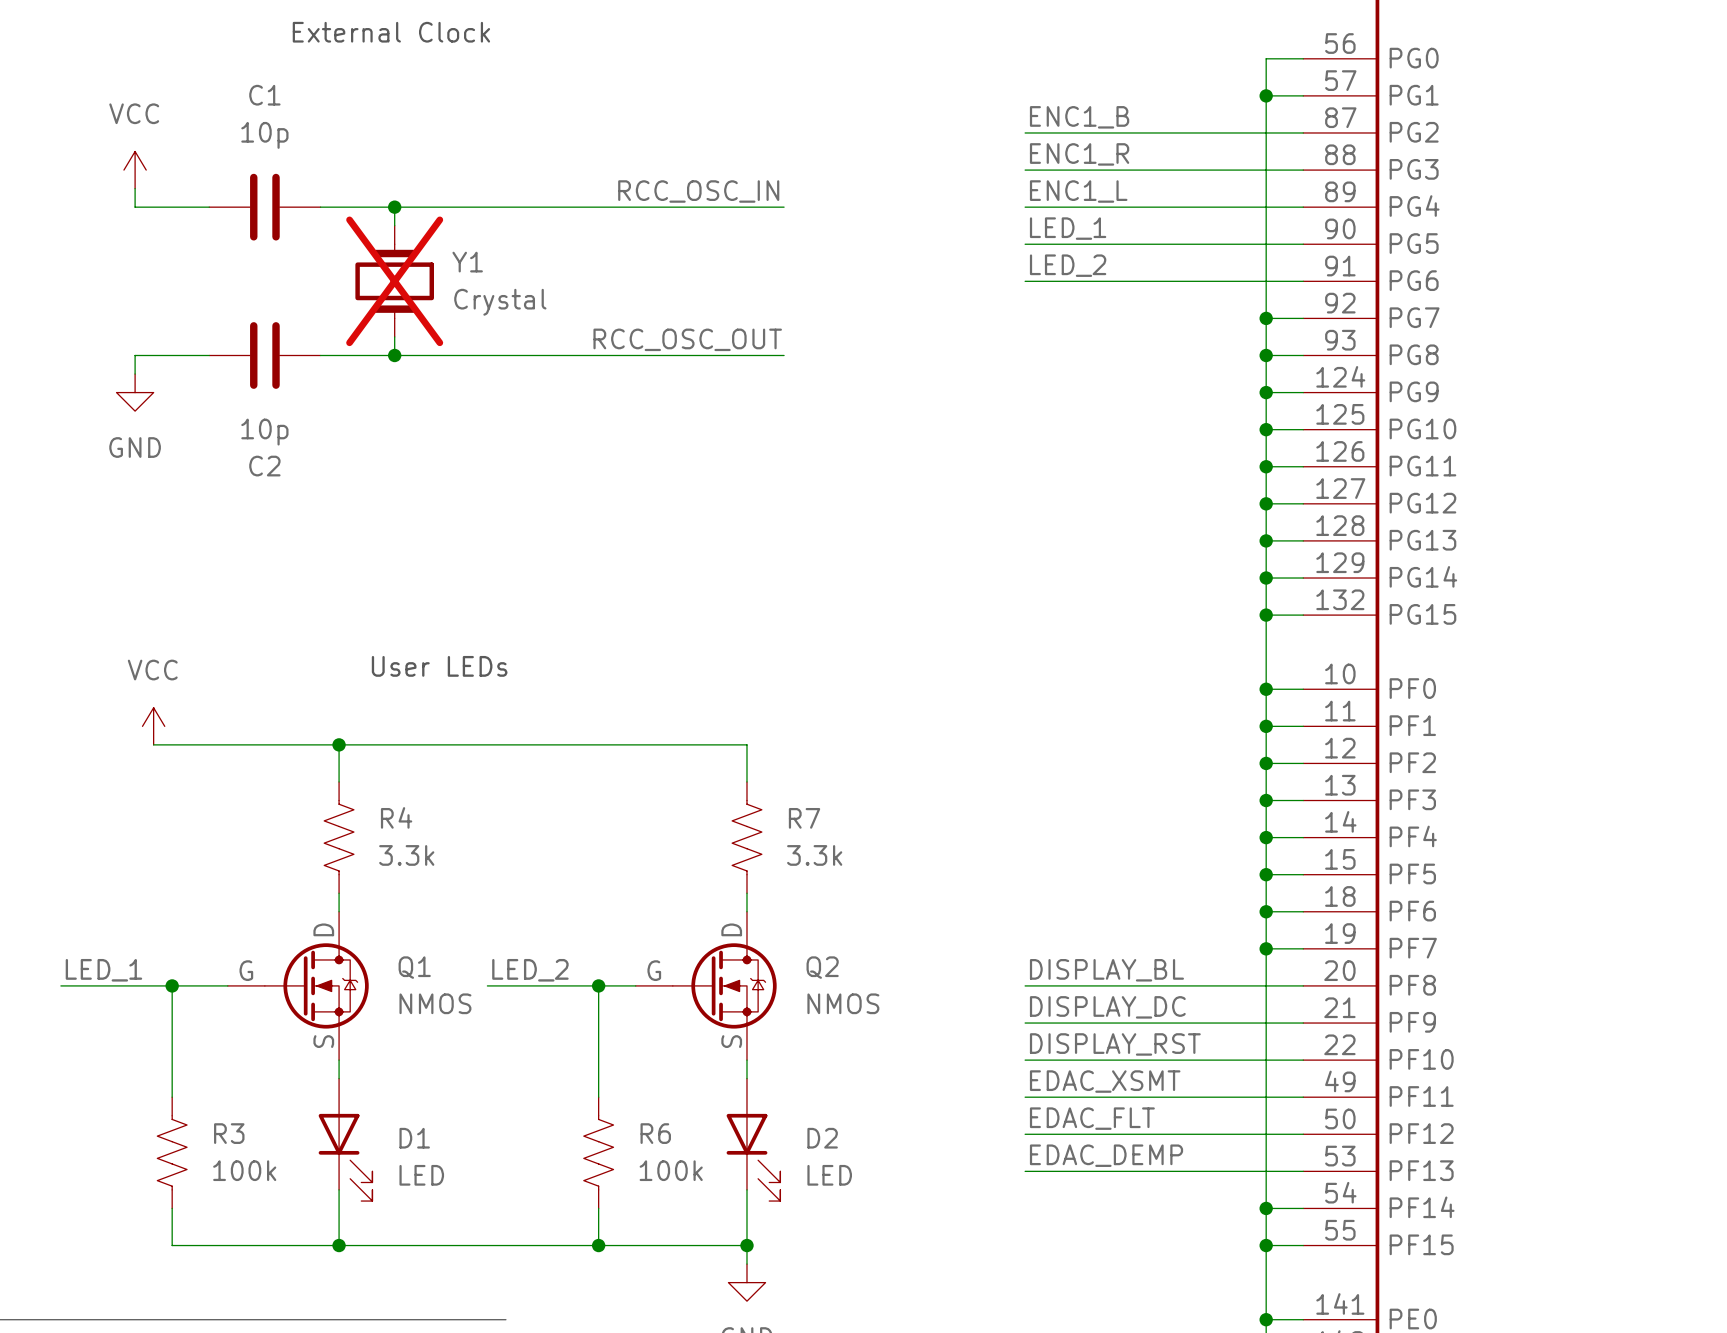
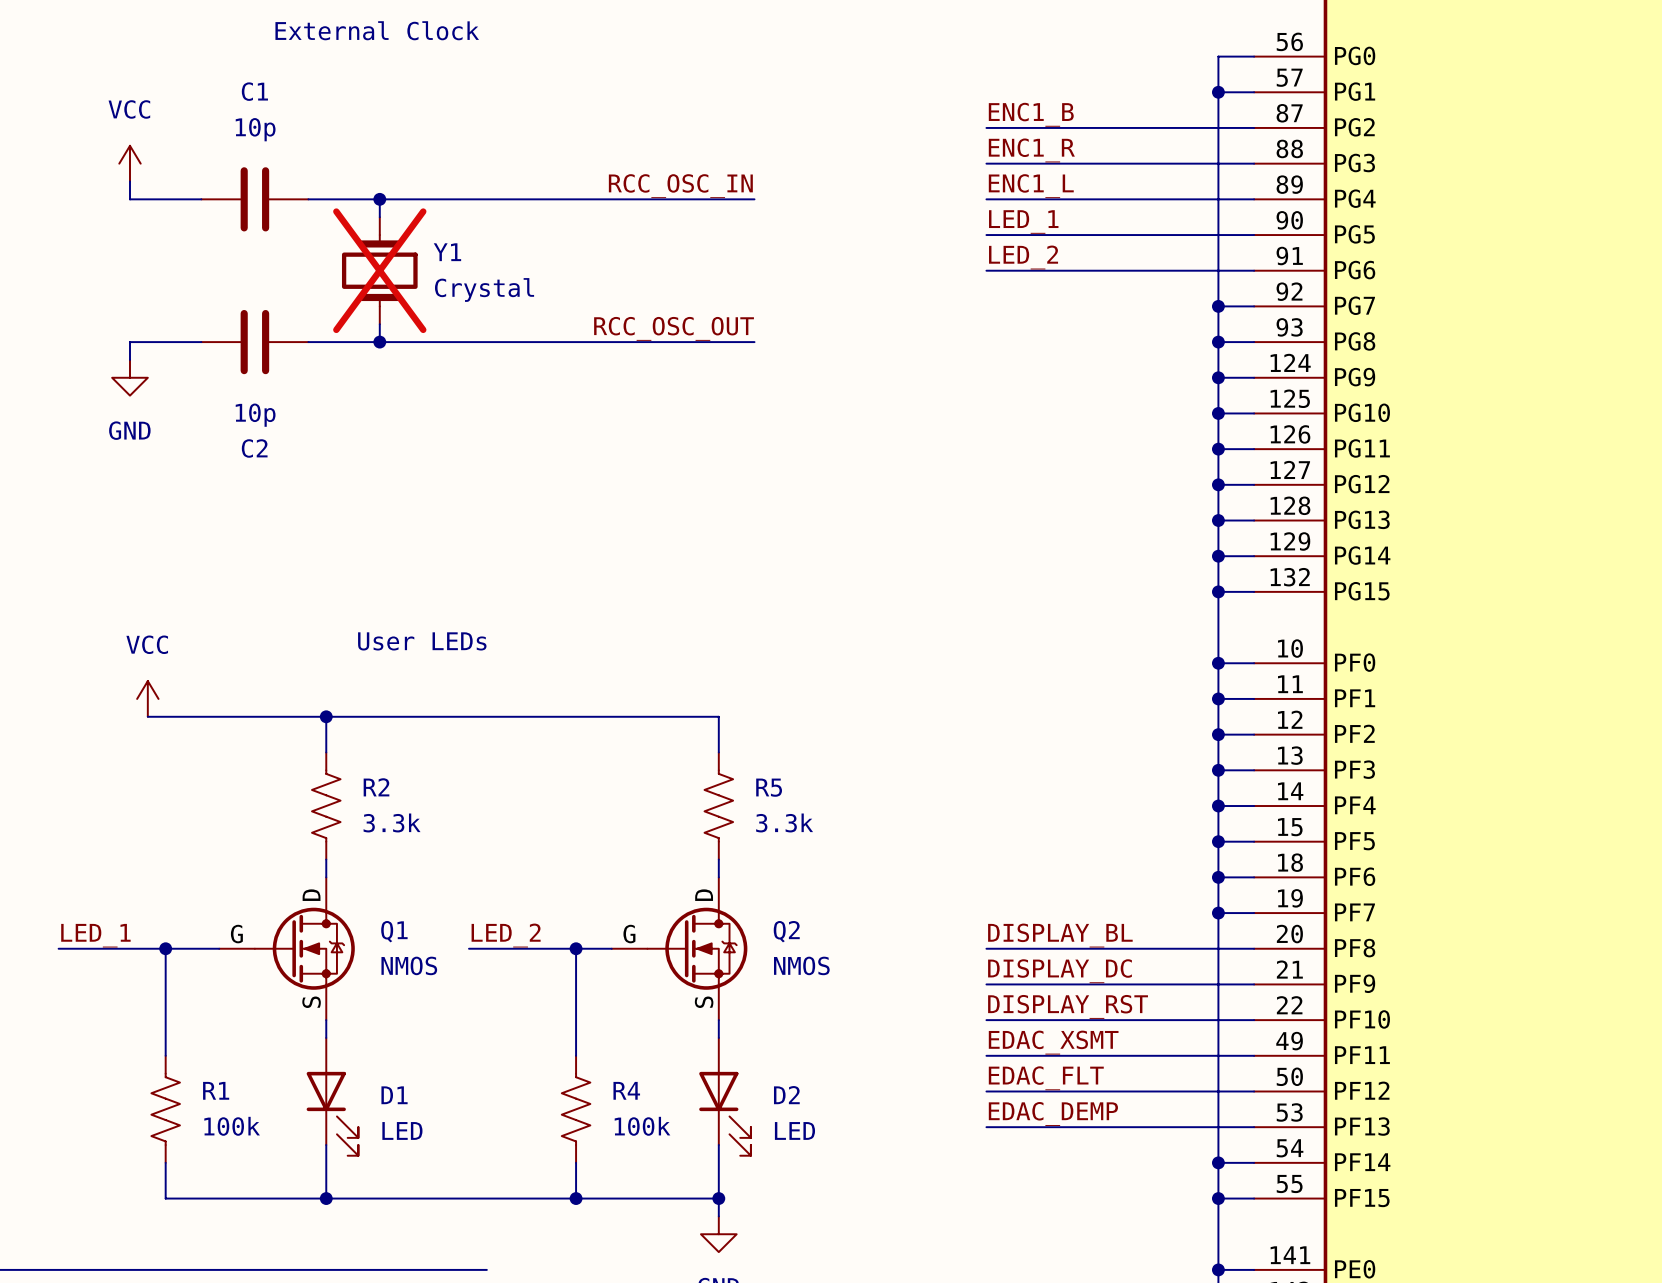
R4 name: R4 (396, 817) -> R2 (376, 787)
R7 name: R7 (804, 818) -> R5 (769, 787)
R3 name: R3 (229, 1133) -> R1 (216, 1090)
R6 name: R6 (655, 1133) -> R4 (626, 1090)

